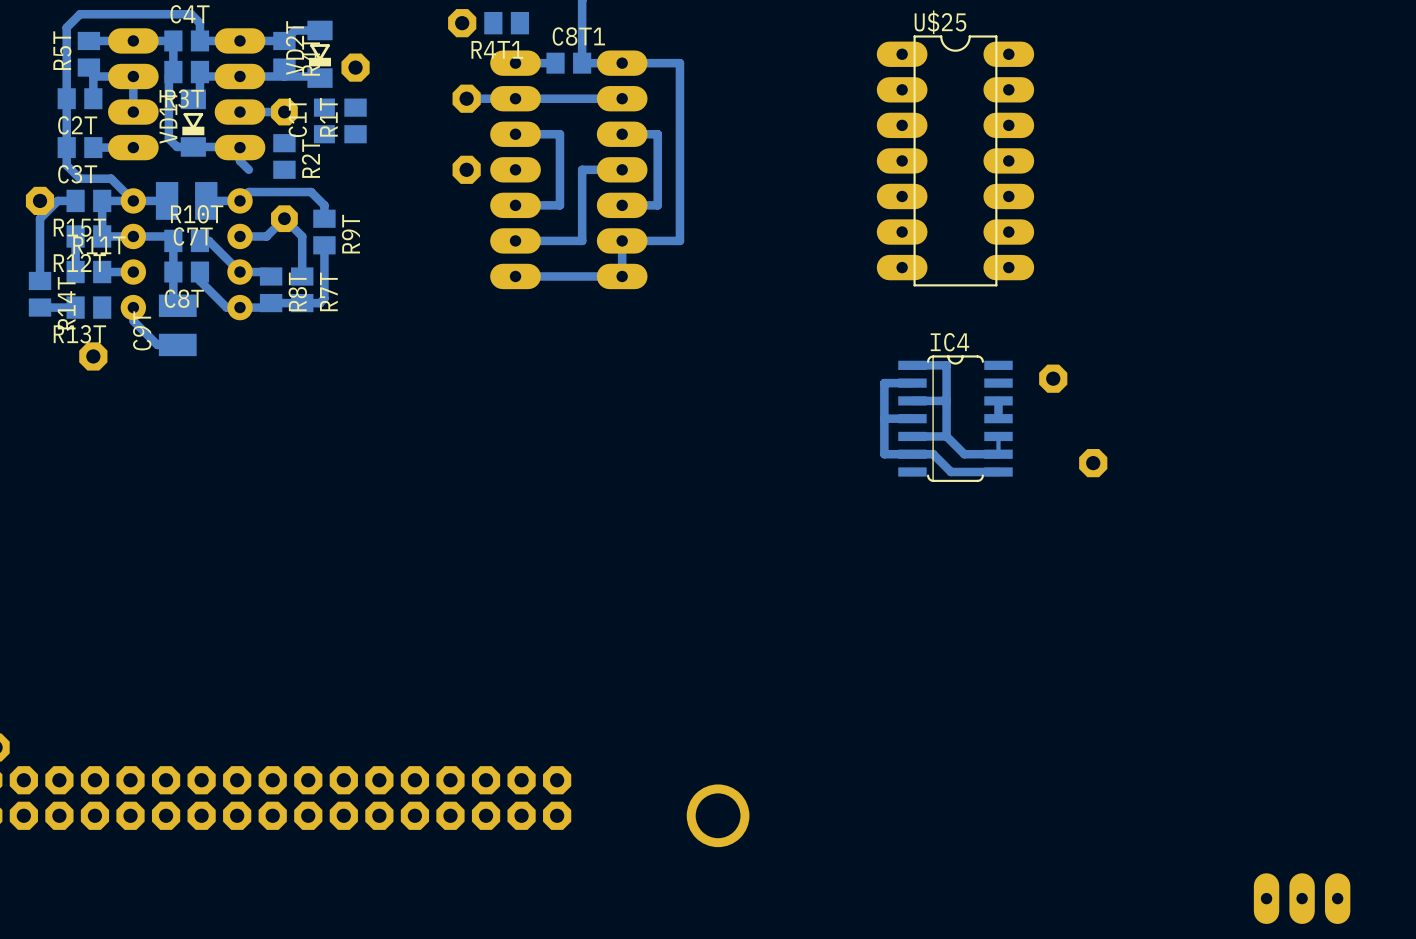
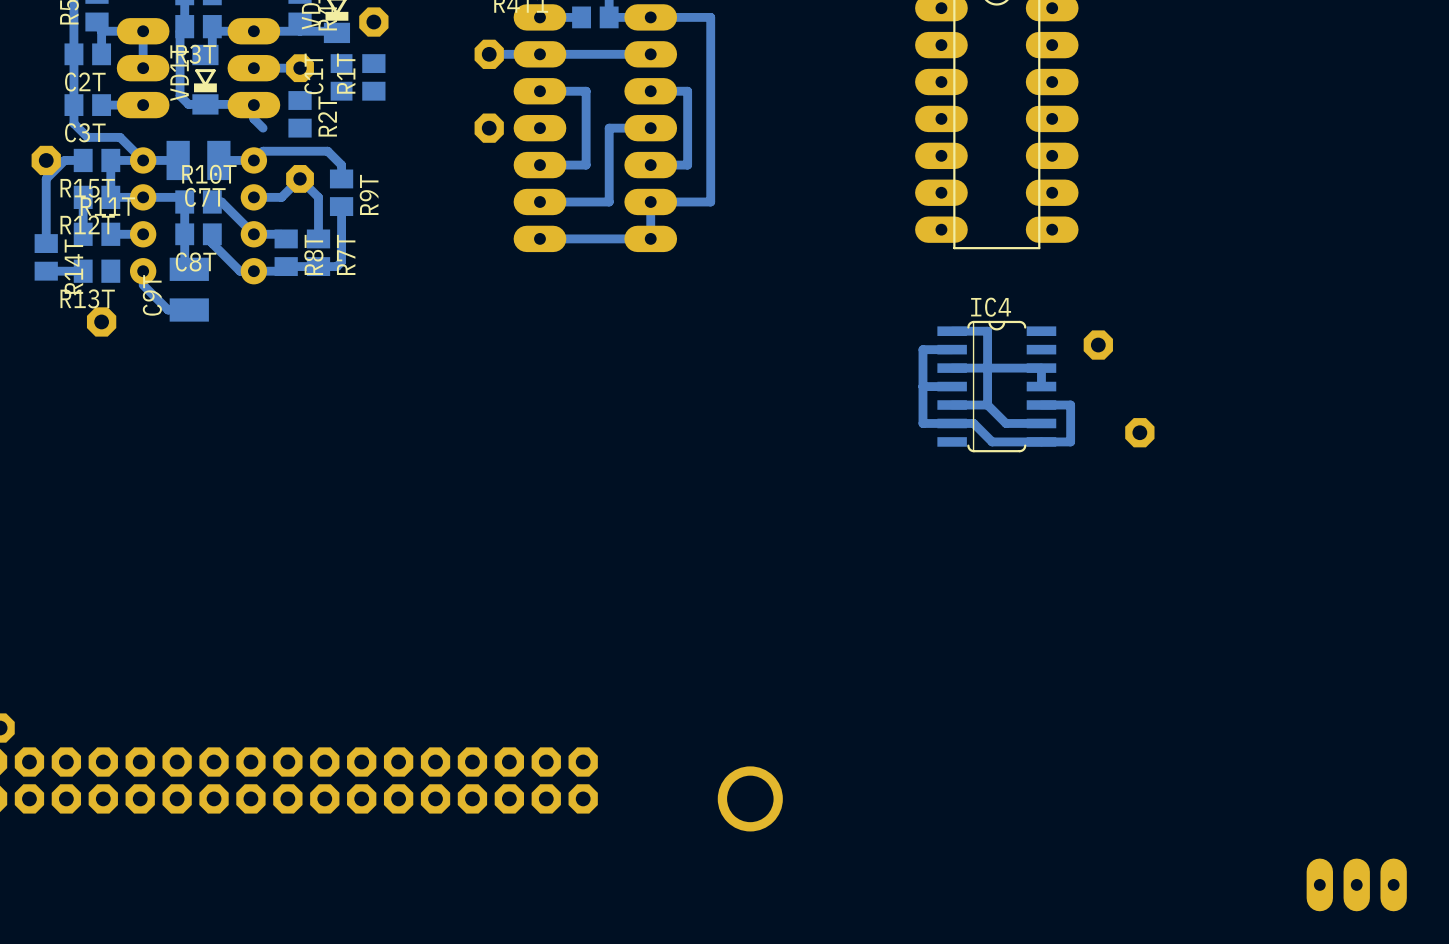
track: none -> (1041, 368) (987, 368)
track: (998, 436) (998, 454) -> (1041, 405) (1070, 405) (1070, 441) (1041, 441)

